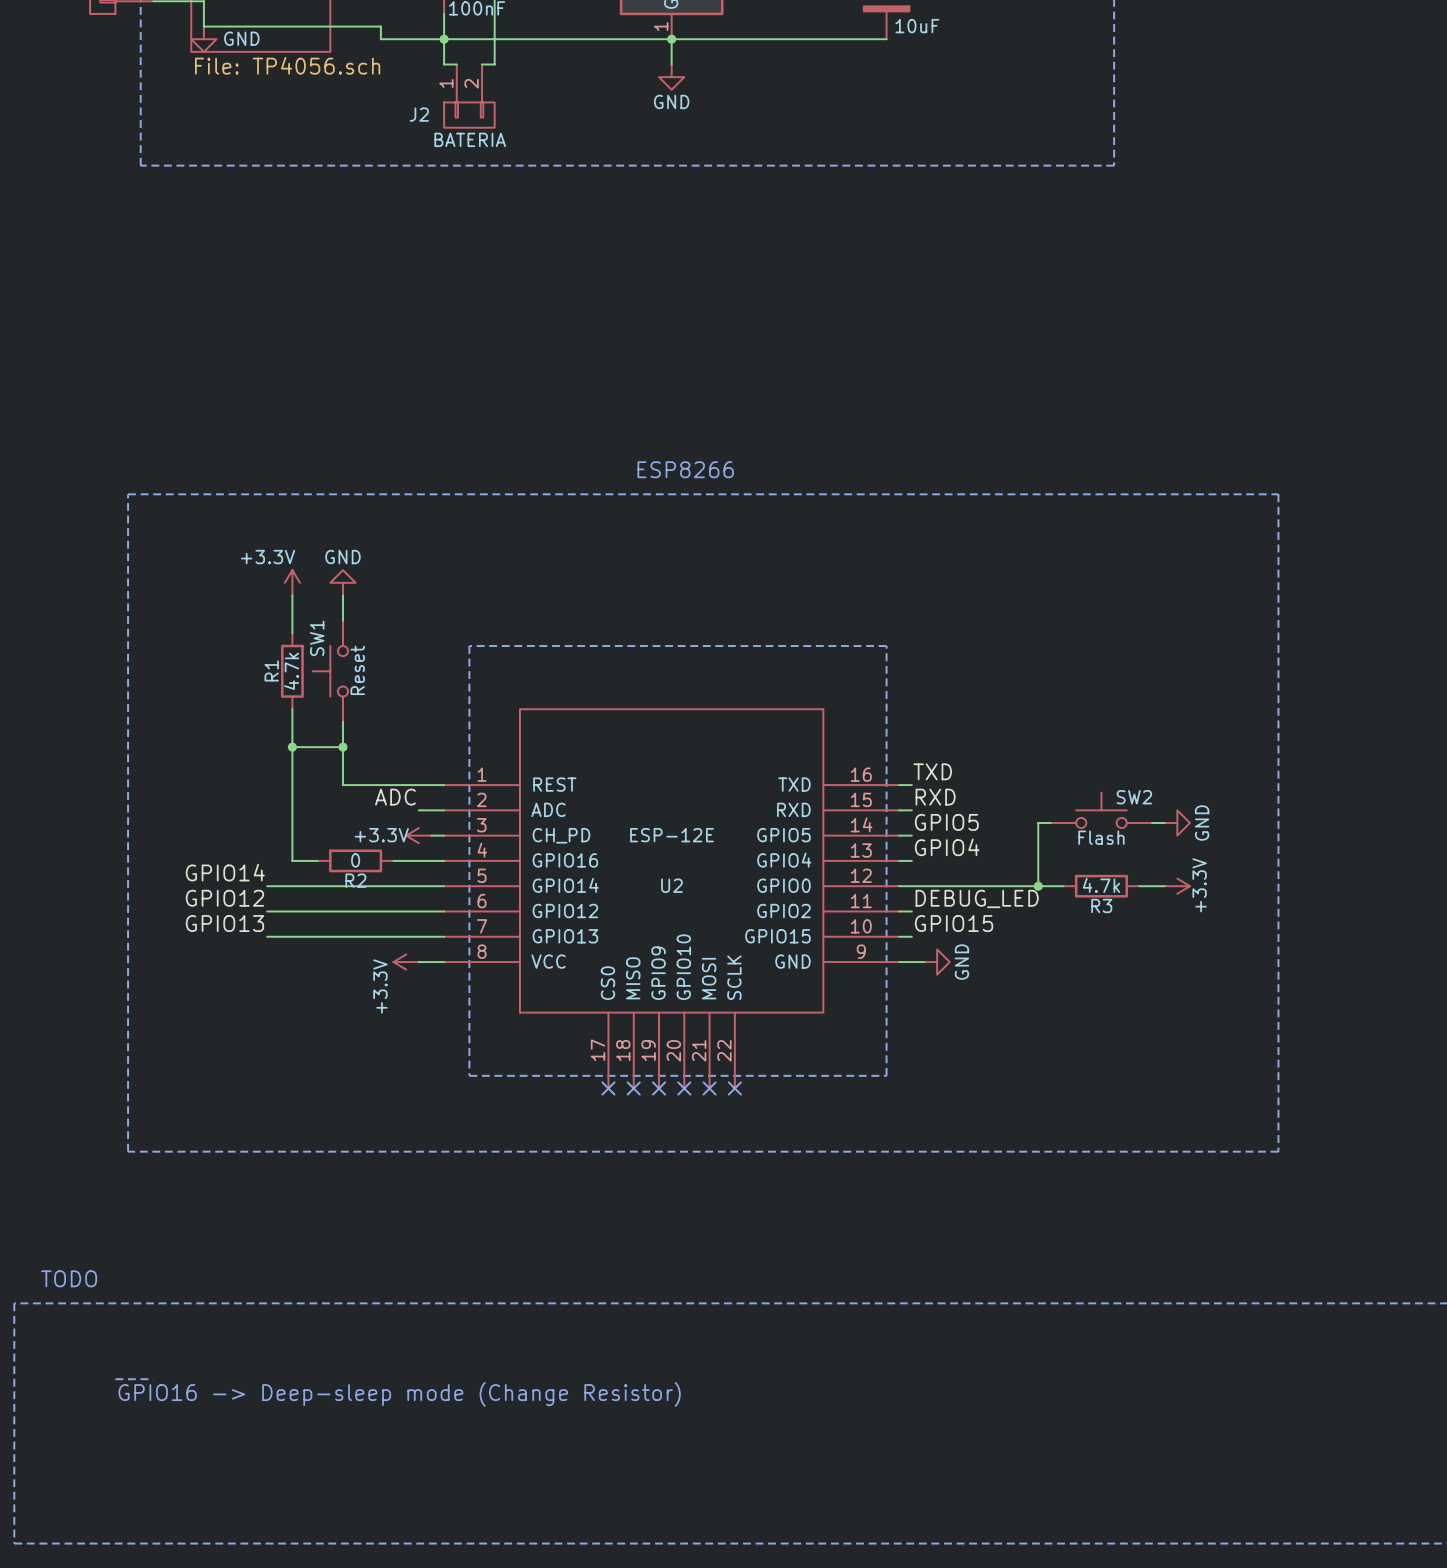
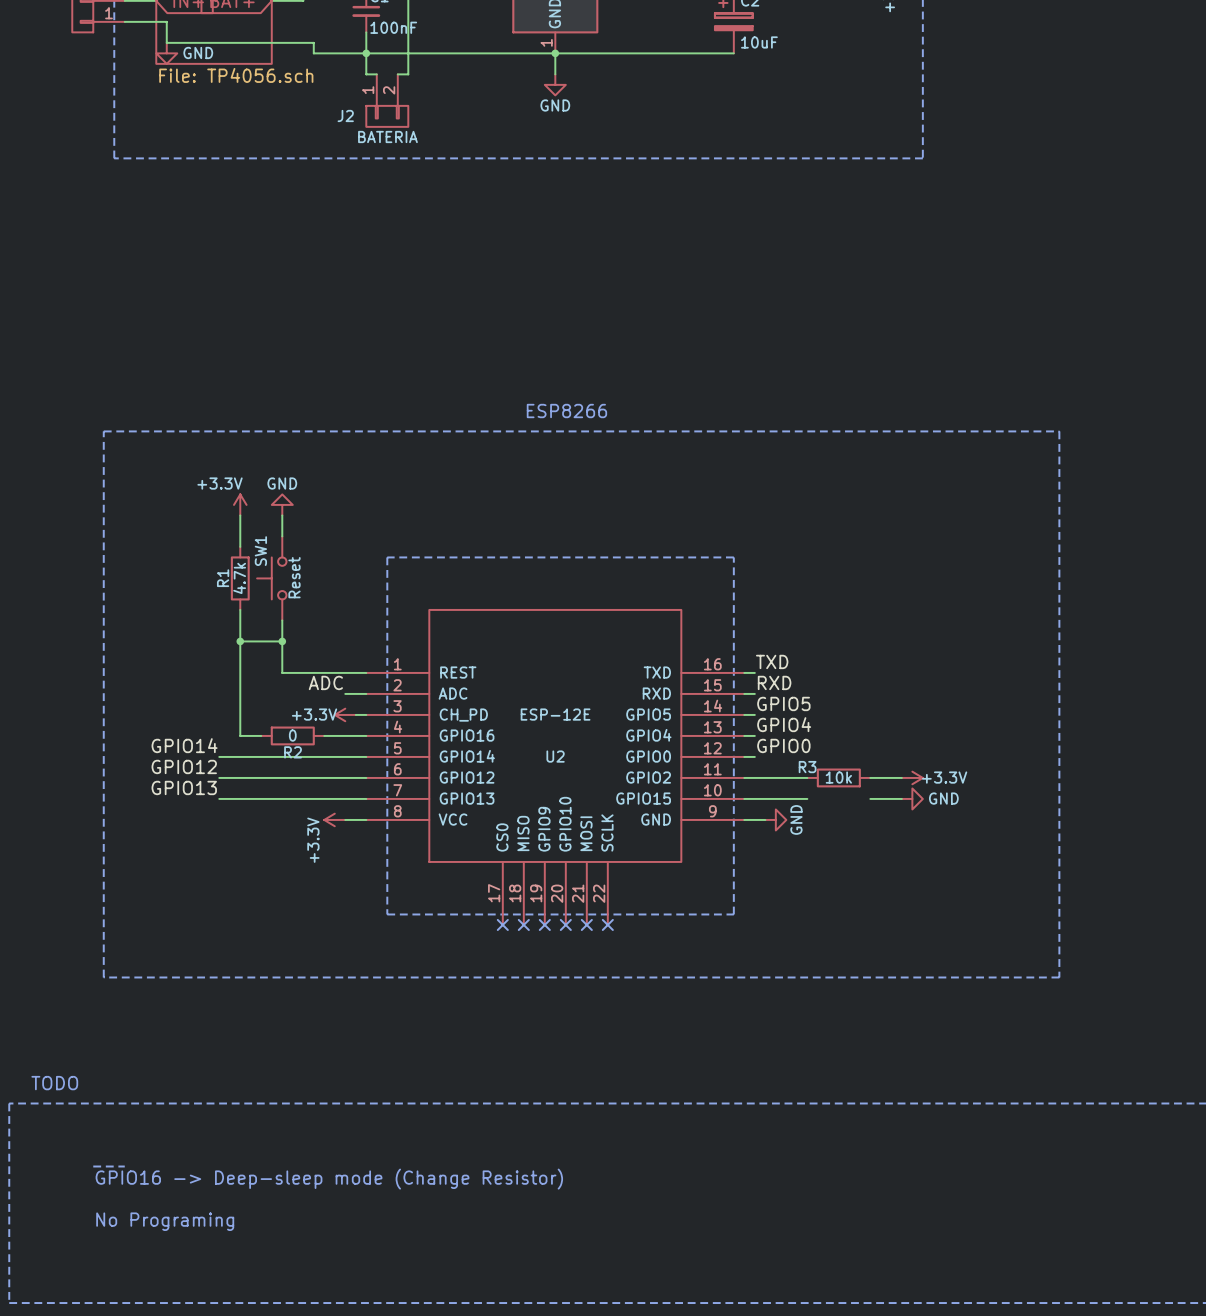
SW2: Flash (1101, 810) -> none
wire: (1050, 822) (1038, 822) (1038, 886) -> none
wire: (1152, 822) (1164, 822) -> none
power symbol position: GND (1177, 822) -> GND (912, 798)
power symbol text rotation: 0° (1202, 822) -> 90° clockwise (943, 798)
label: none -> GPIO0 (783, 745)
R3 value: 4.7k (1101, 885) -> 10k (838, 777)
power symbol text rotation: 0° (1199, 885) -> 90° clockwise (944, 777)
wire: (911, 886) (1063, 886) -> none
junction: (1038, 886) -> none
R3 position: (1101, 886) -> (838, 777)
wire: (1139, 886) (1164, 886) -> none
power symbol position: +3.3V (1177, 886) -> +3.3V (912, 777)
label: DEBUG_LED (977, 898) -> none
R3 name position: R3 (1101, 905) -> R3 (807, 767)
wire: none -> (754, 777) (807, 777)
wire: none -> (870, 777) (901, 777)
label: GPIO15 (954, 923) -> none
wire: none -> (754, 798) (807, 798)
wire: none -> (870, 798) (901, 798)
text: none -> No Programing (165, 1221)

